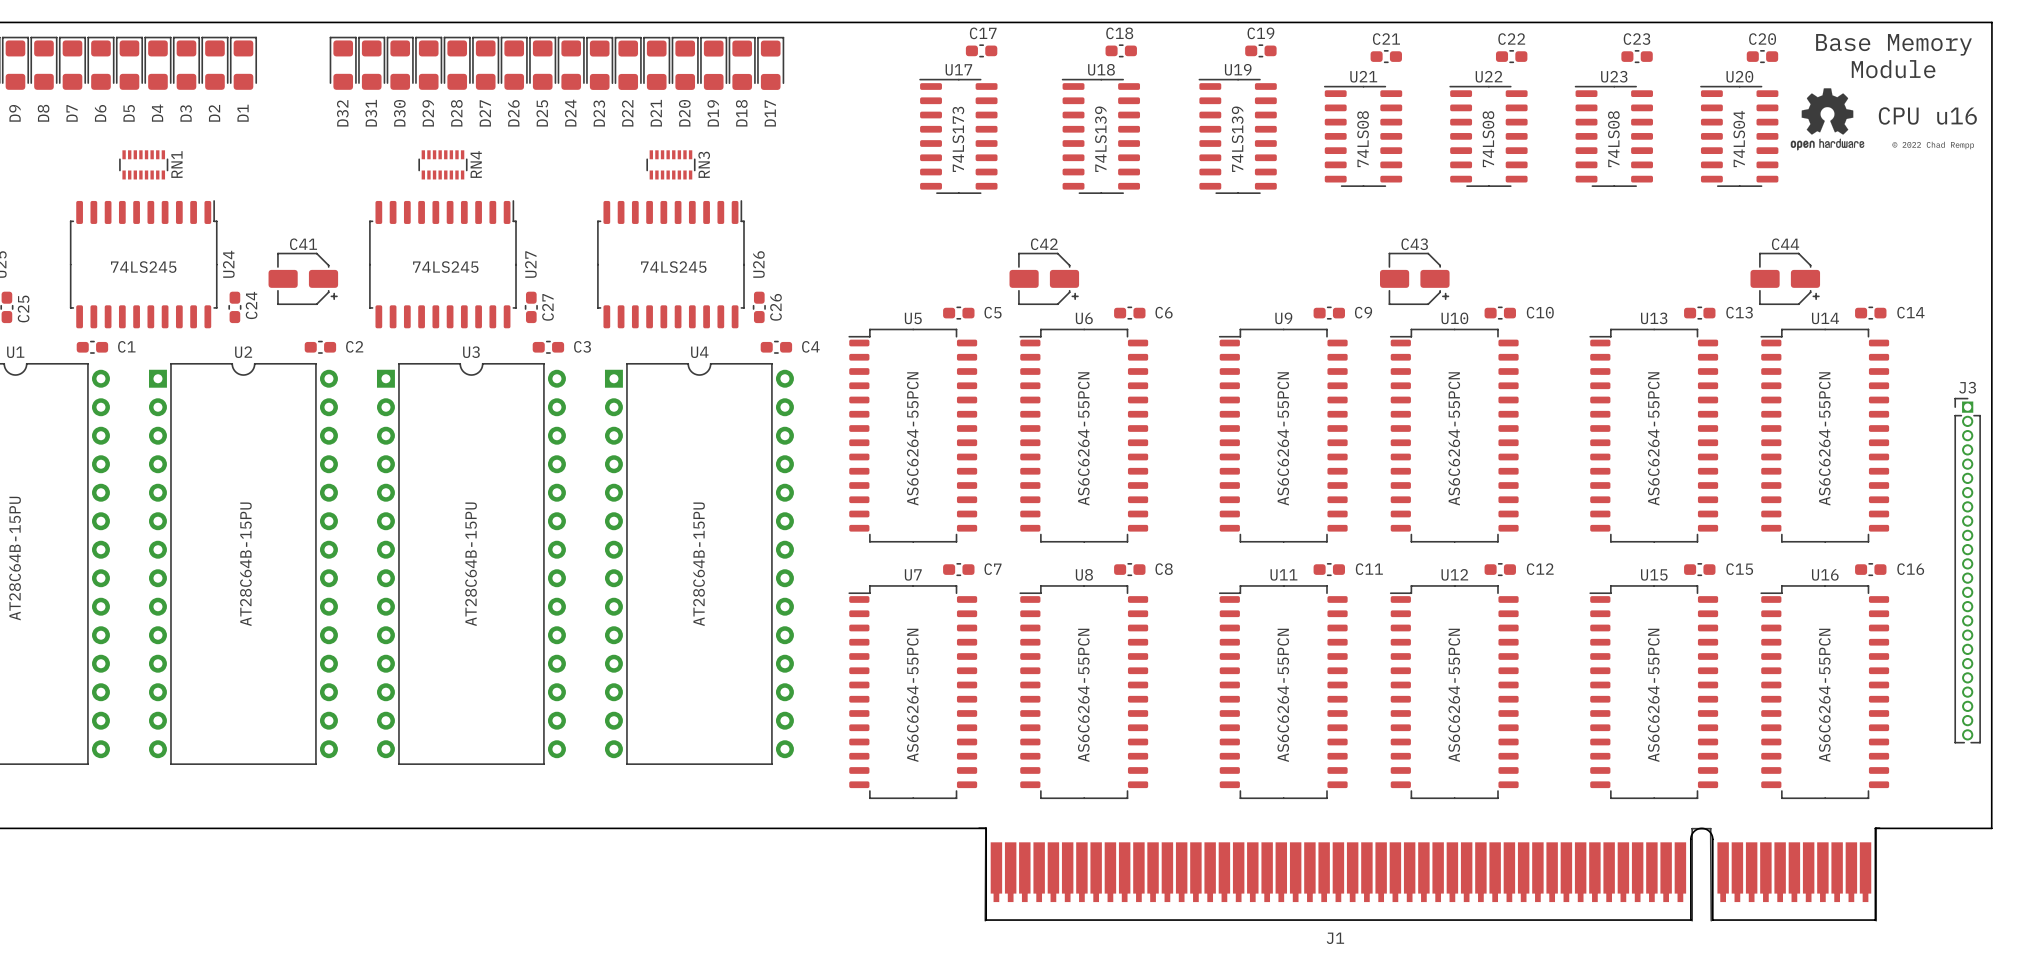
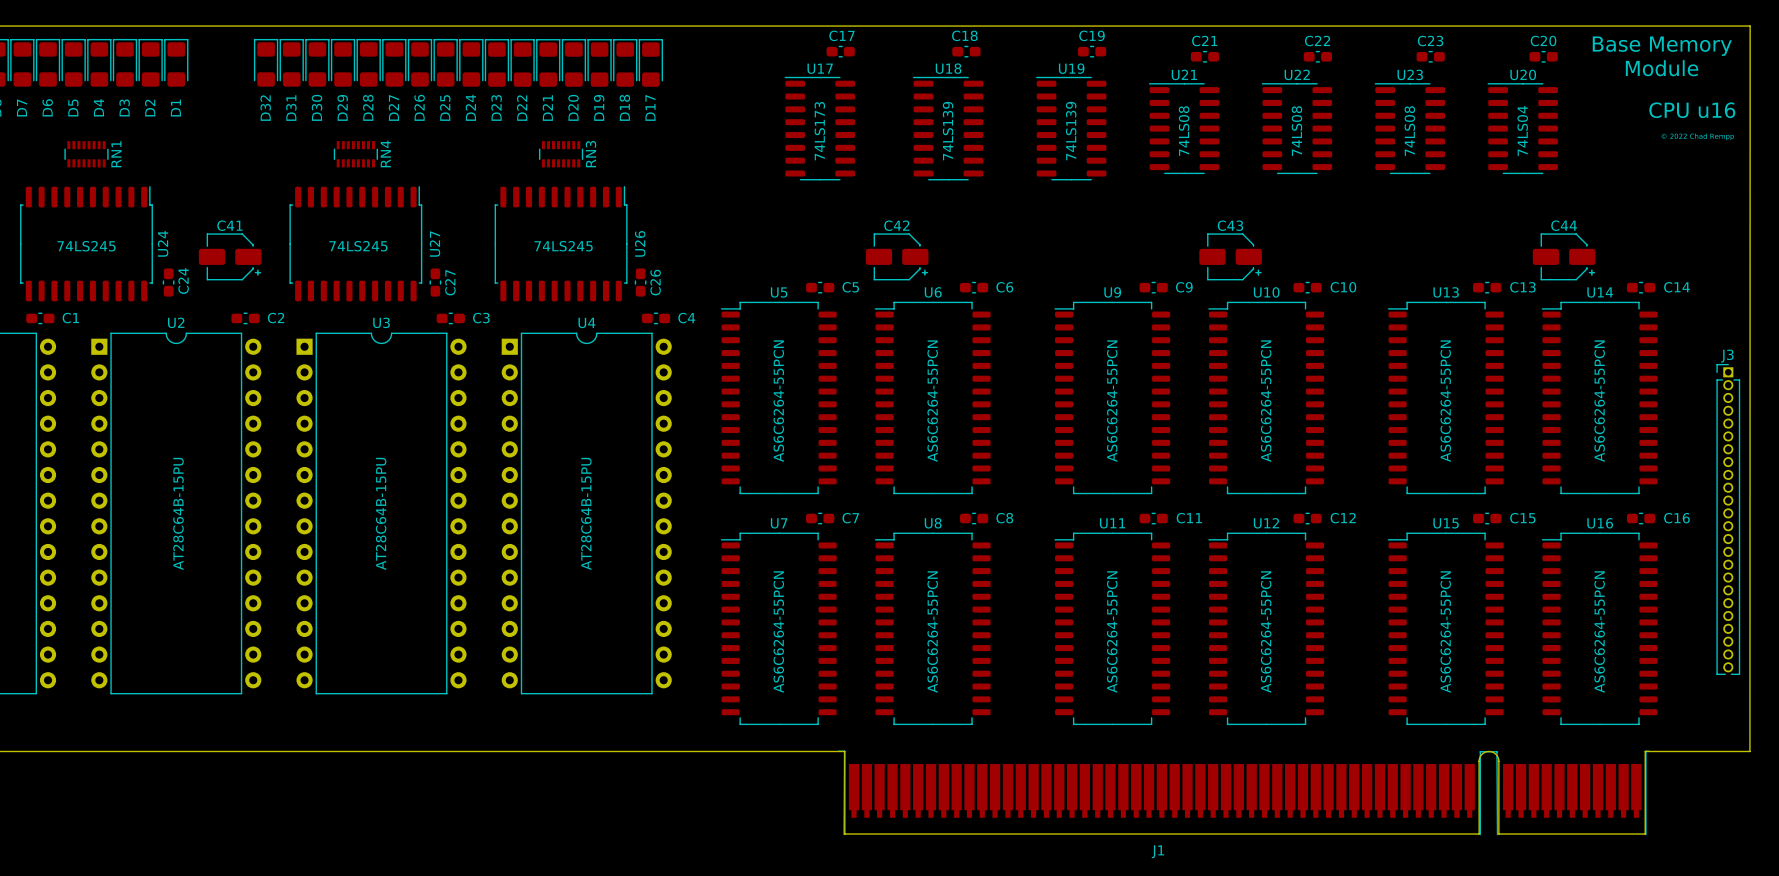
drawing: [1790, 88, 1865, 151] -> none

